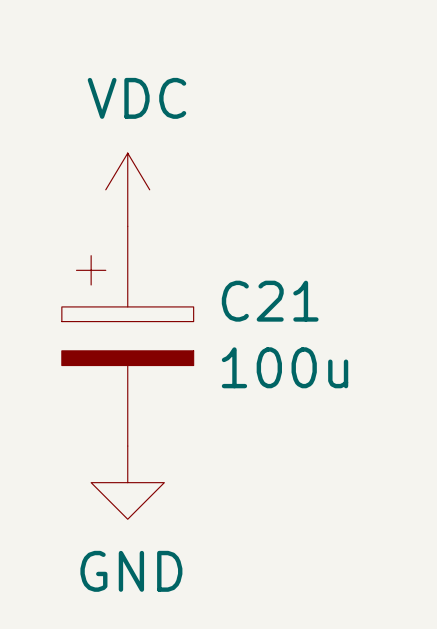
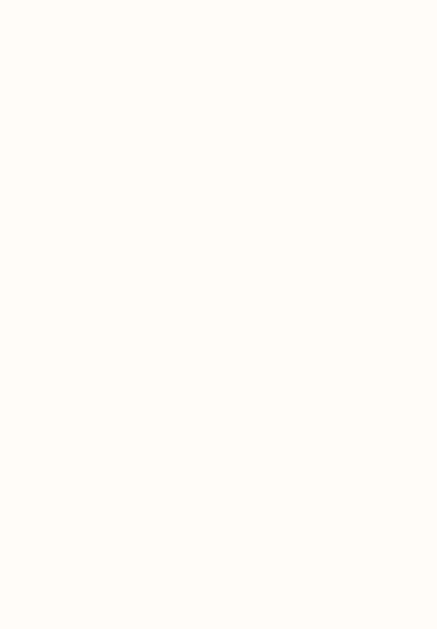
power symbol: VDC (127, 189) -> none
C21: 100u (127, 336) -> none
power symbol: GND (127, 482) -> none

